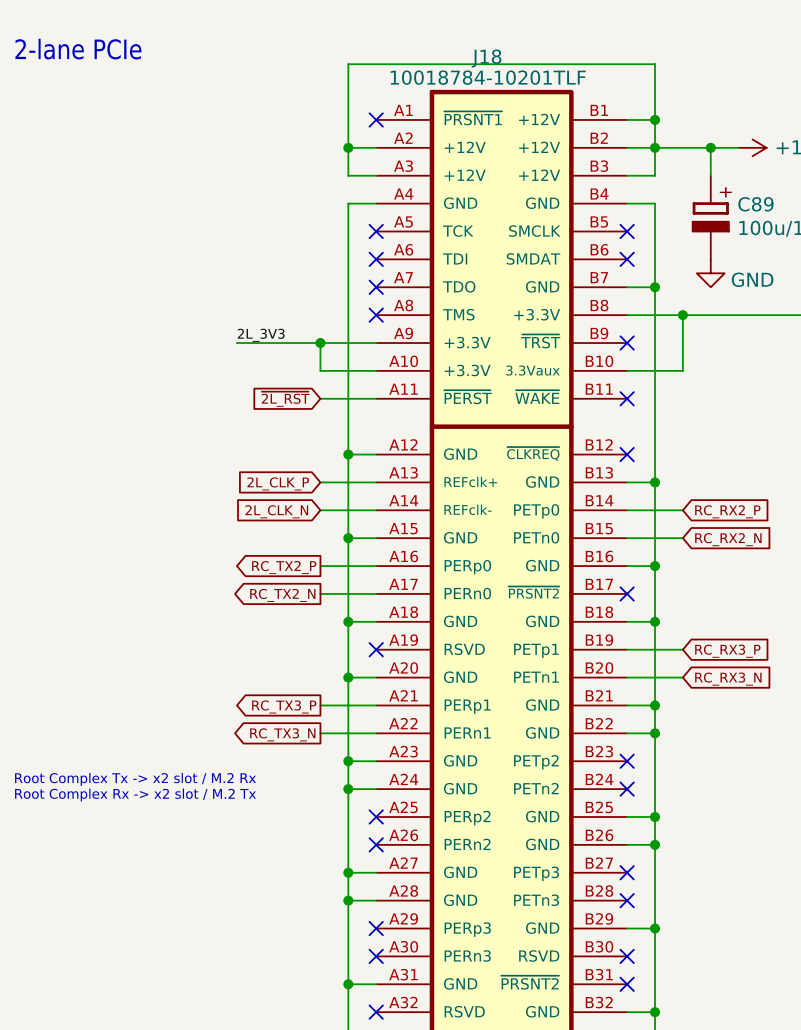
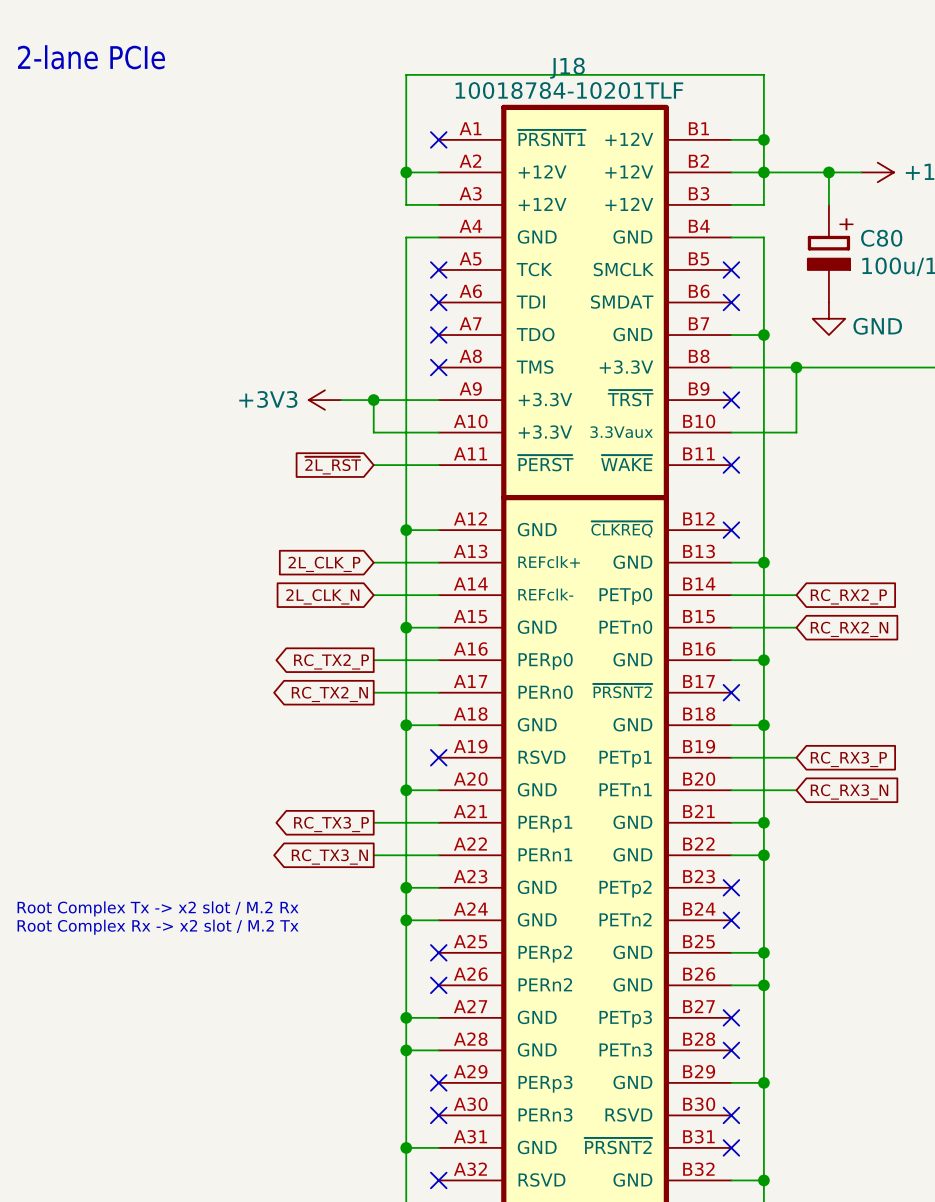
C89 name: C89 (755, 204) -> C80 (881, 238)
label: 2L_3V3 (261, 335) -> none
power symbol: none -> +3V3 (324, 400)

